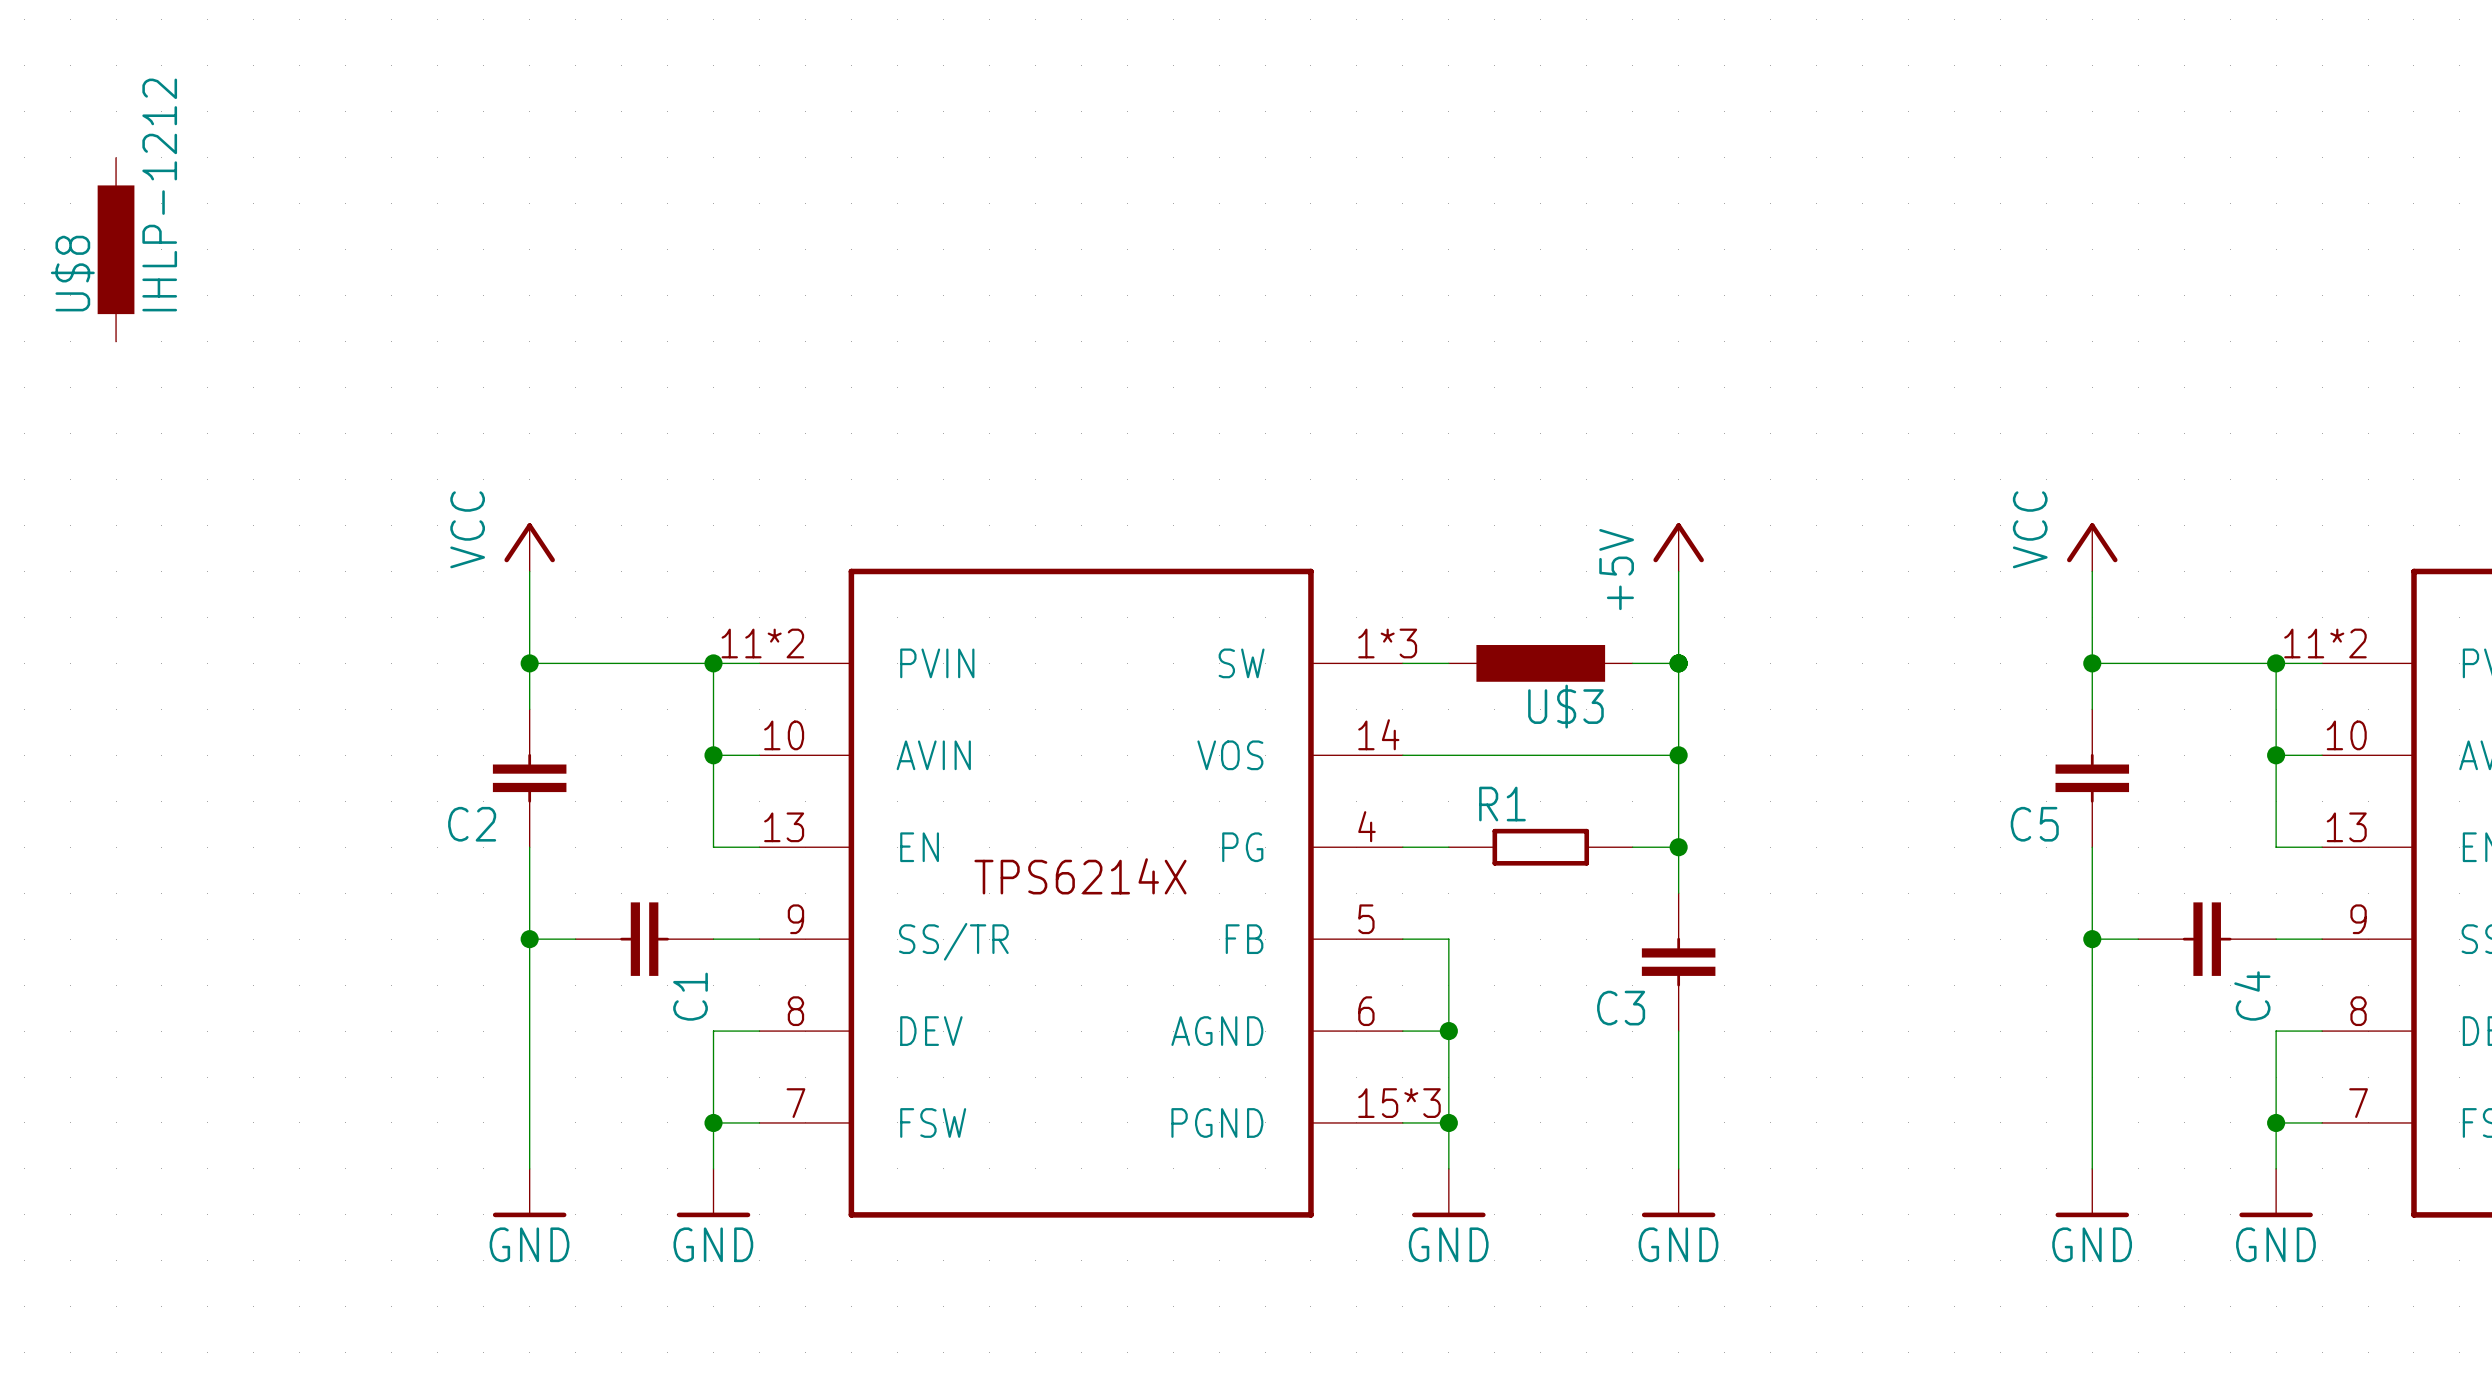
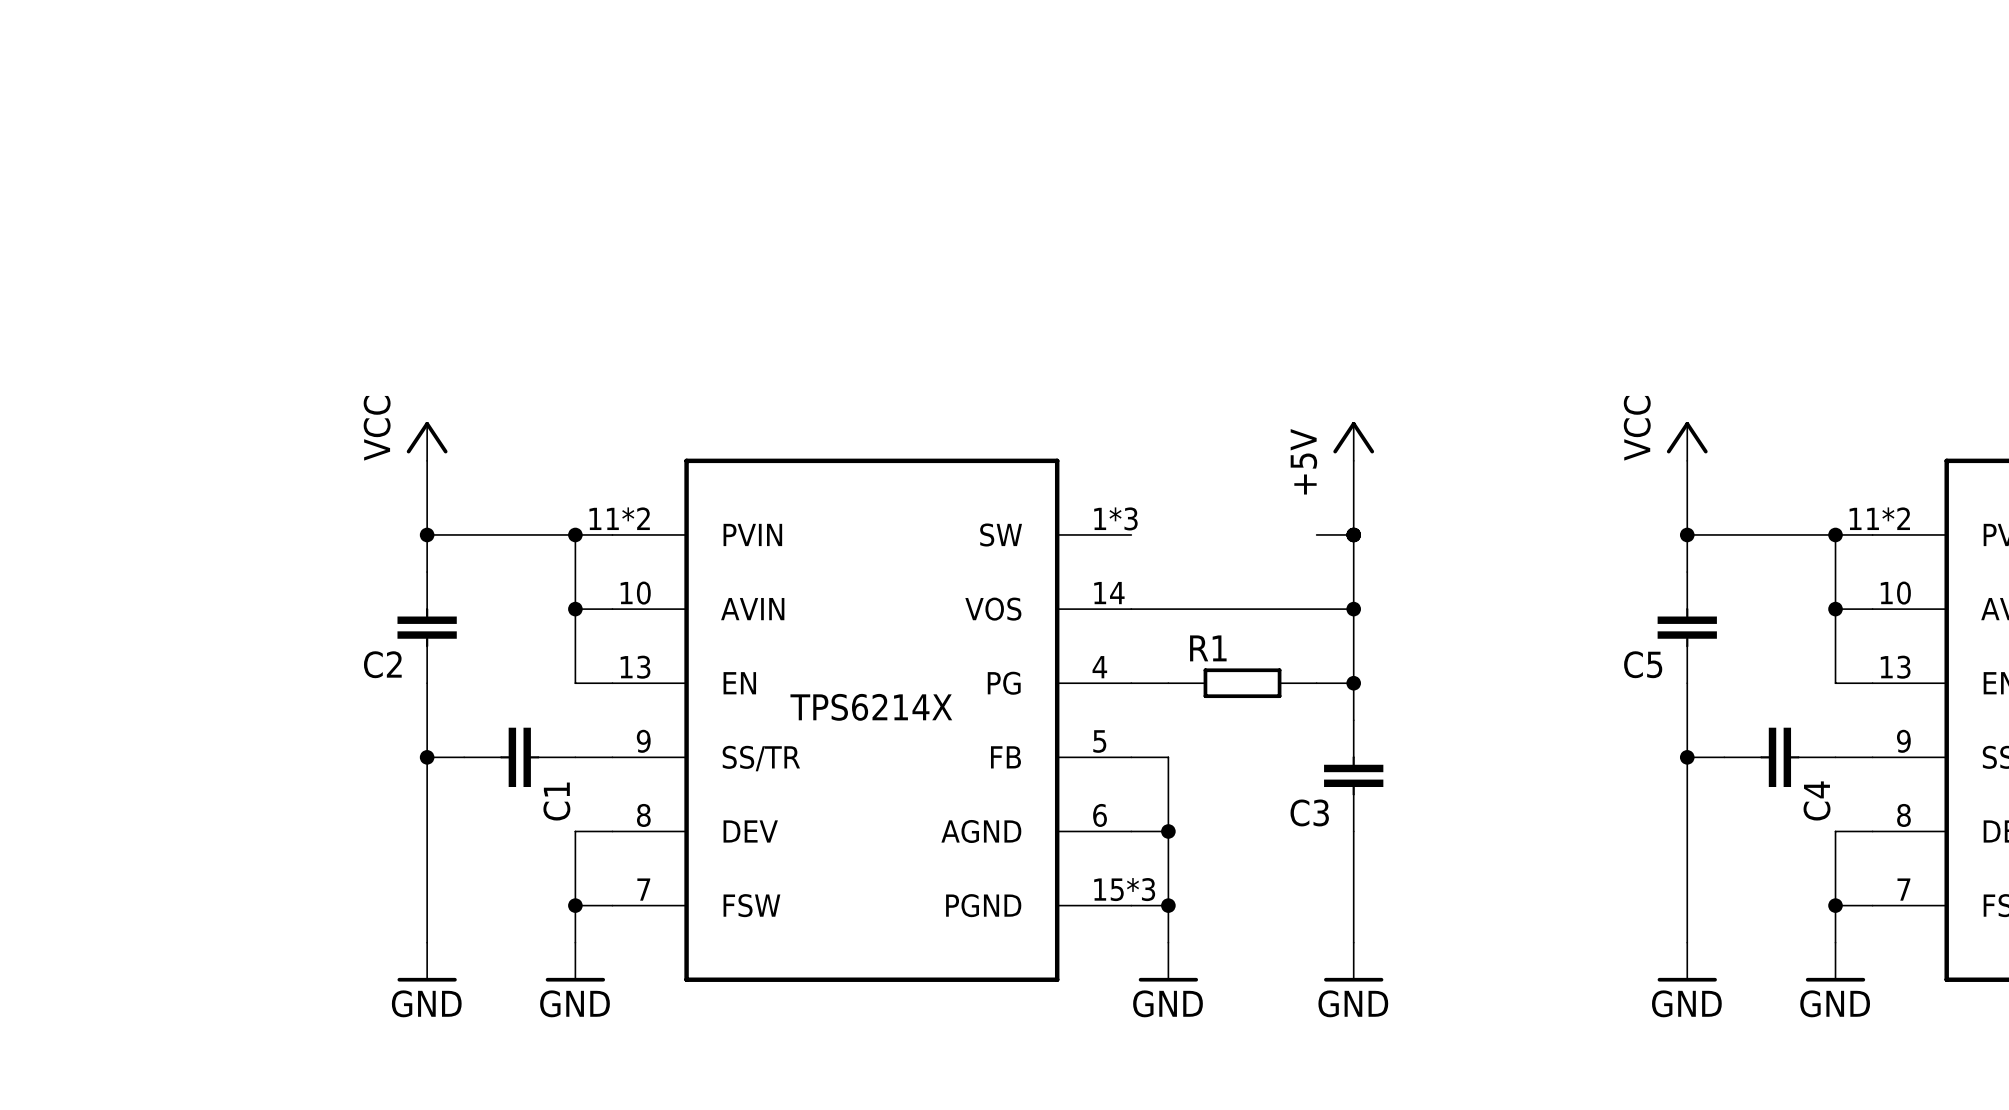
U$8: IHLP-1212 (116, 249) -> none
wire: (1402, 663) (1448, 663) -> none
U$3: (1540, 663) -> none

